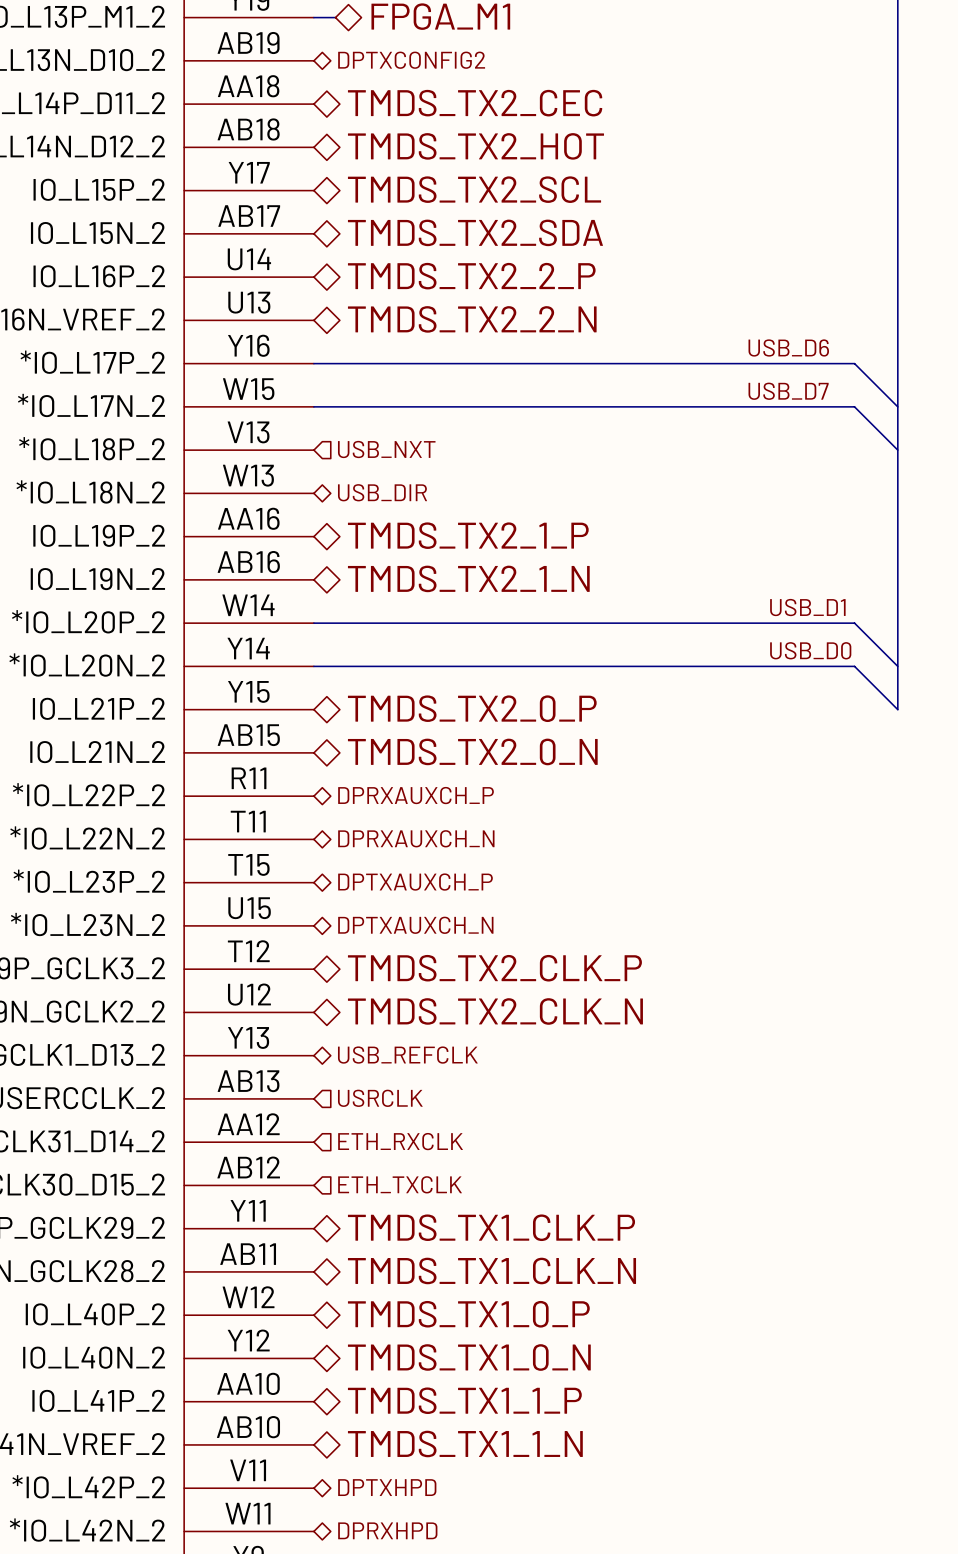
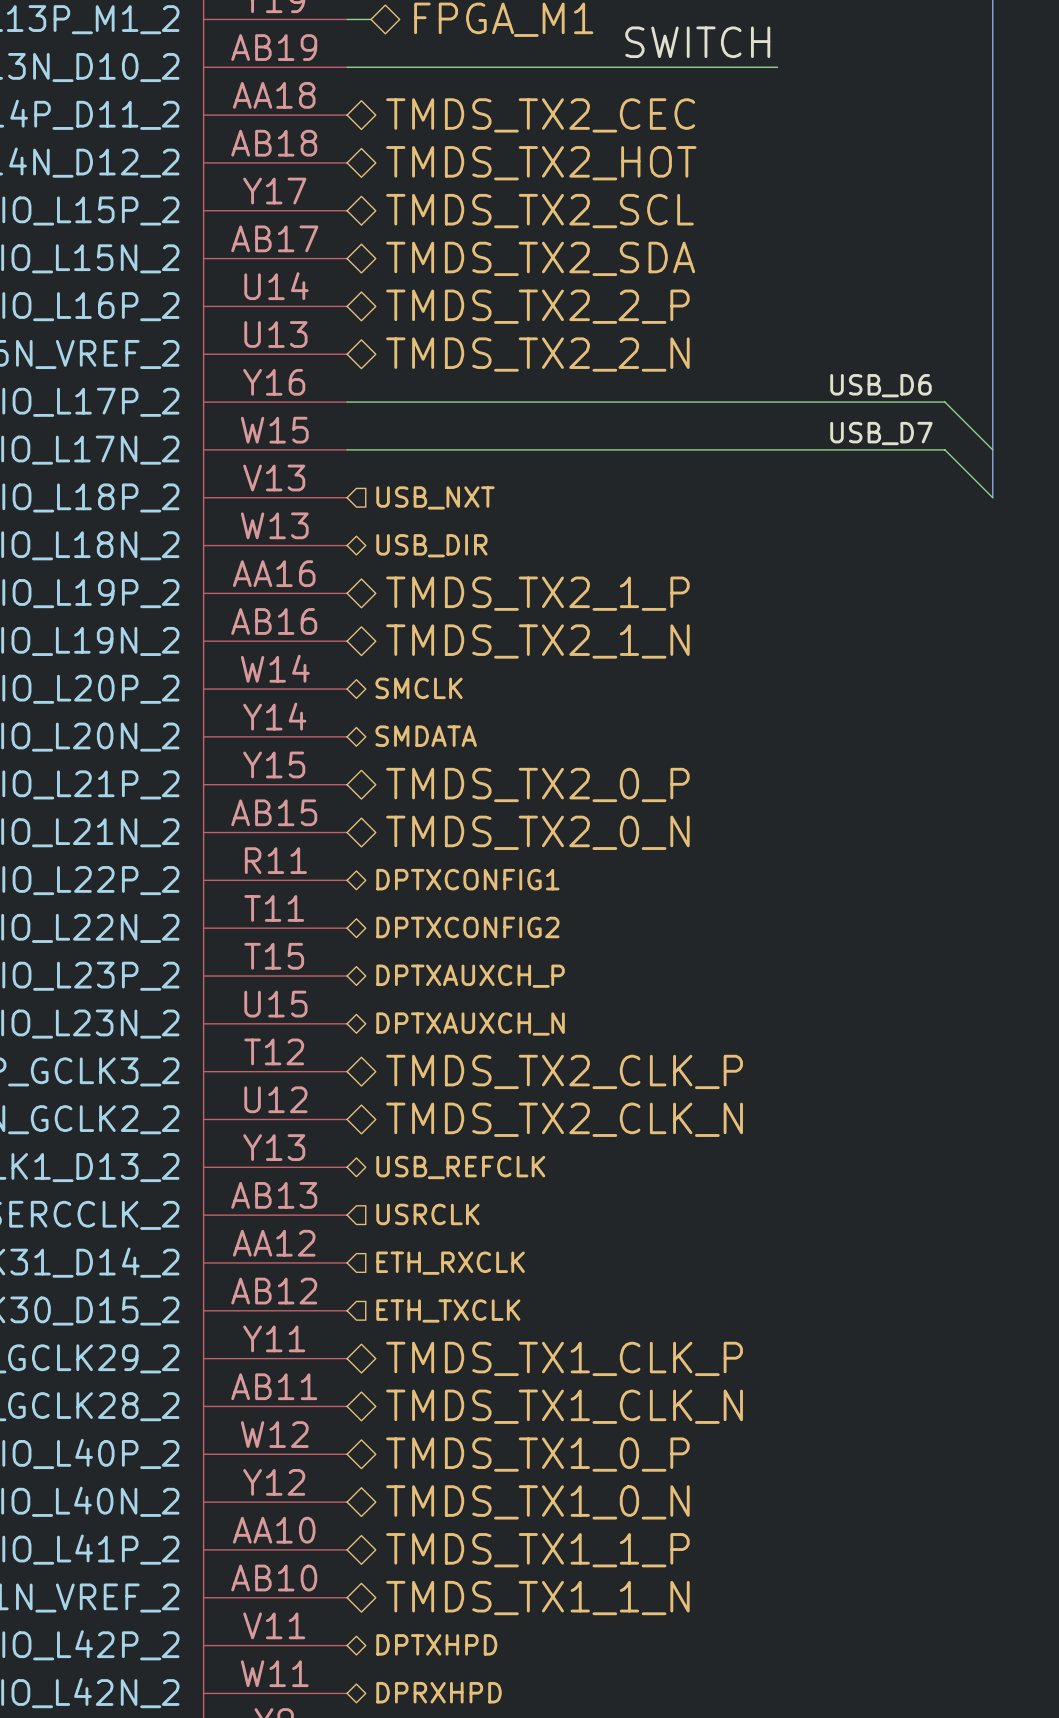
label: none -> SWITCH (697, 42)
wire: none -> (347, 67) (777, 67)
hierarchical label: DPTXCONFIG2 (411, 60) -> none
bus: (897, 450) (897, 709) -> none
label: USB_D1 (807, 607) -> none
hierarchical label: none -> SMCLK (419, 688)
wire: (313, 623) (854, 623) (897, 666) -> none
label: USB_D0 (810, 650) -> none
hierarchical label: none -> SMDATA (426, 736)
wire: (313, 666) (854, 666) (897, 709) -> none
hierarchical label: DPRXAUXCH_P (416, 795) -> DPTXCONFIG1 (467, 879)
hierarchical label: DPRXAUXCH_N (416, 838) -> DPTXCONFIG2 (467, 927)

